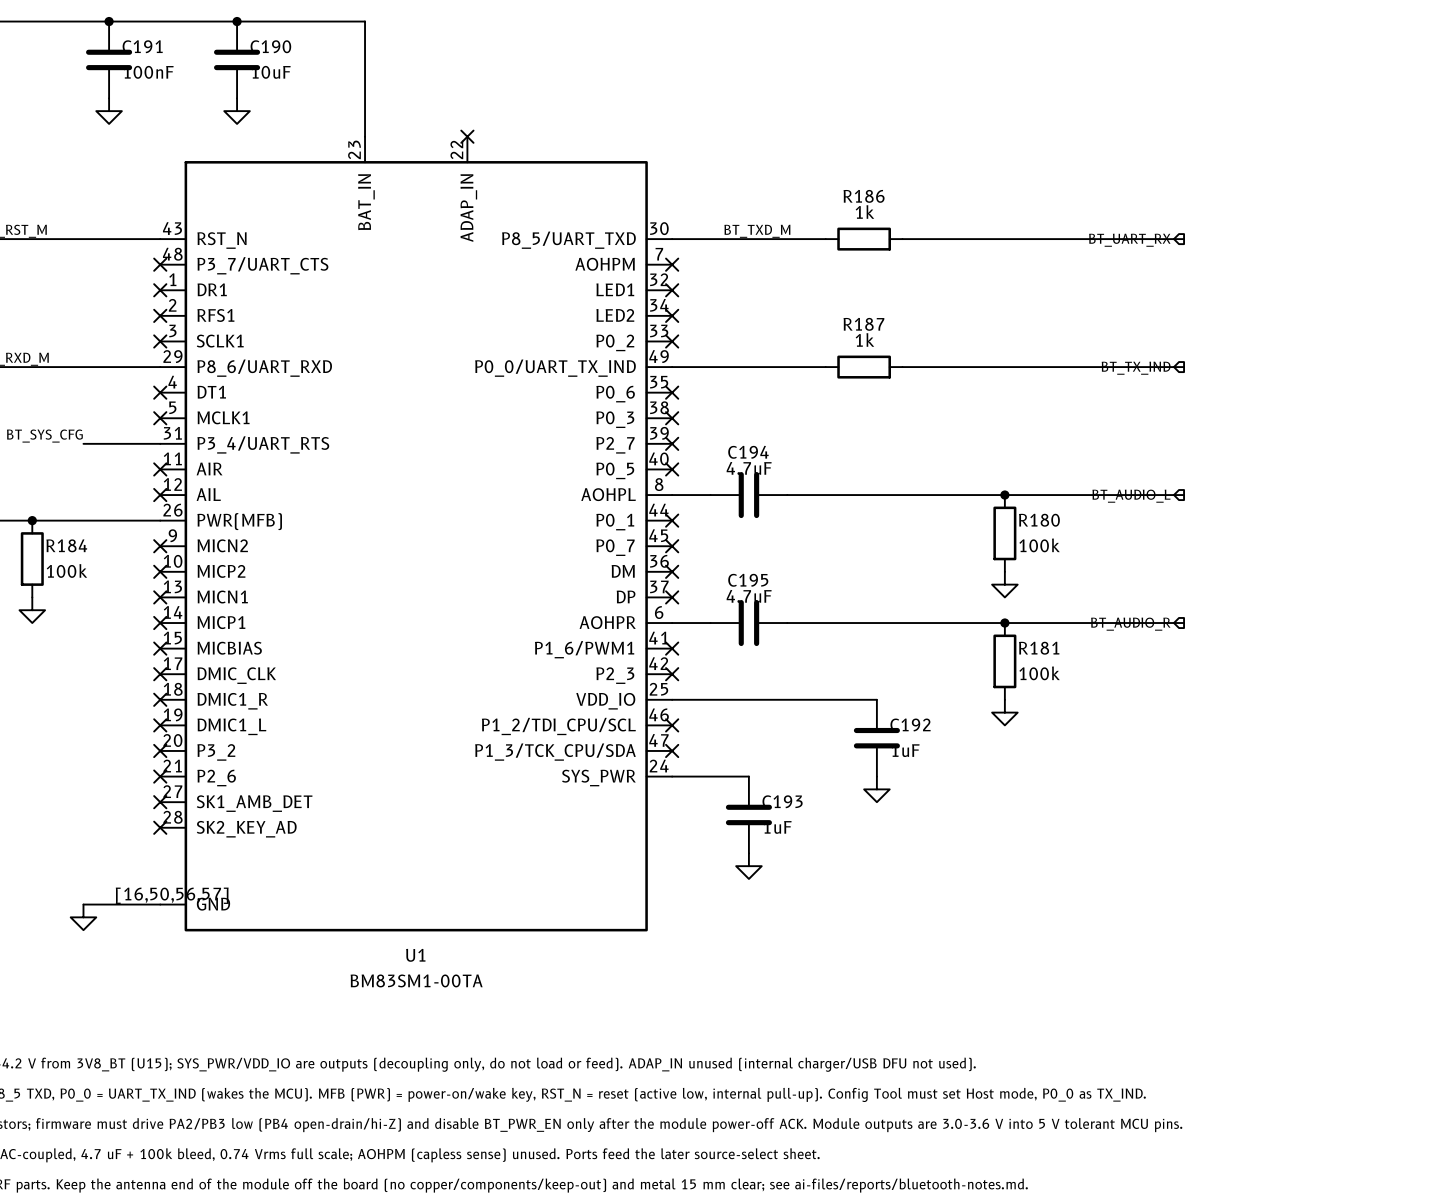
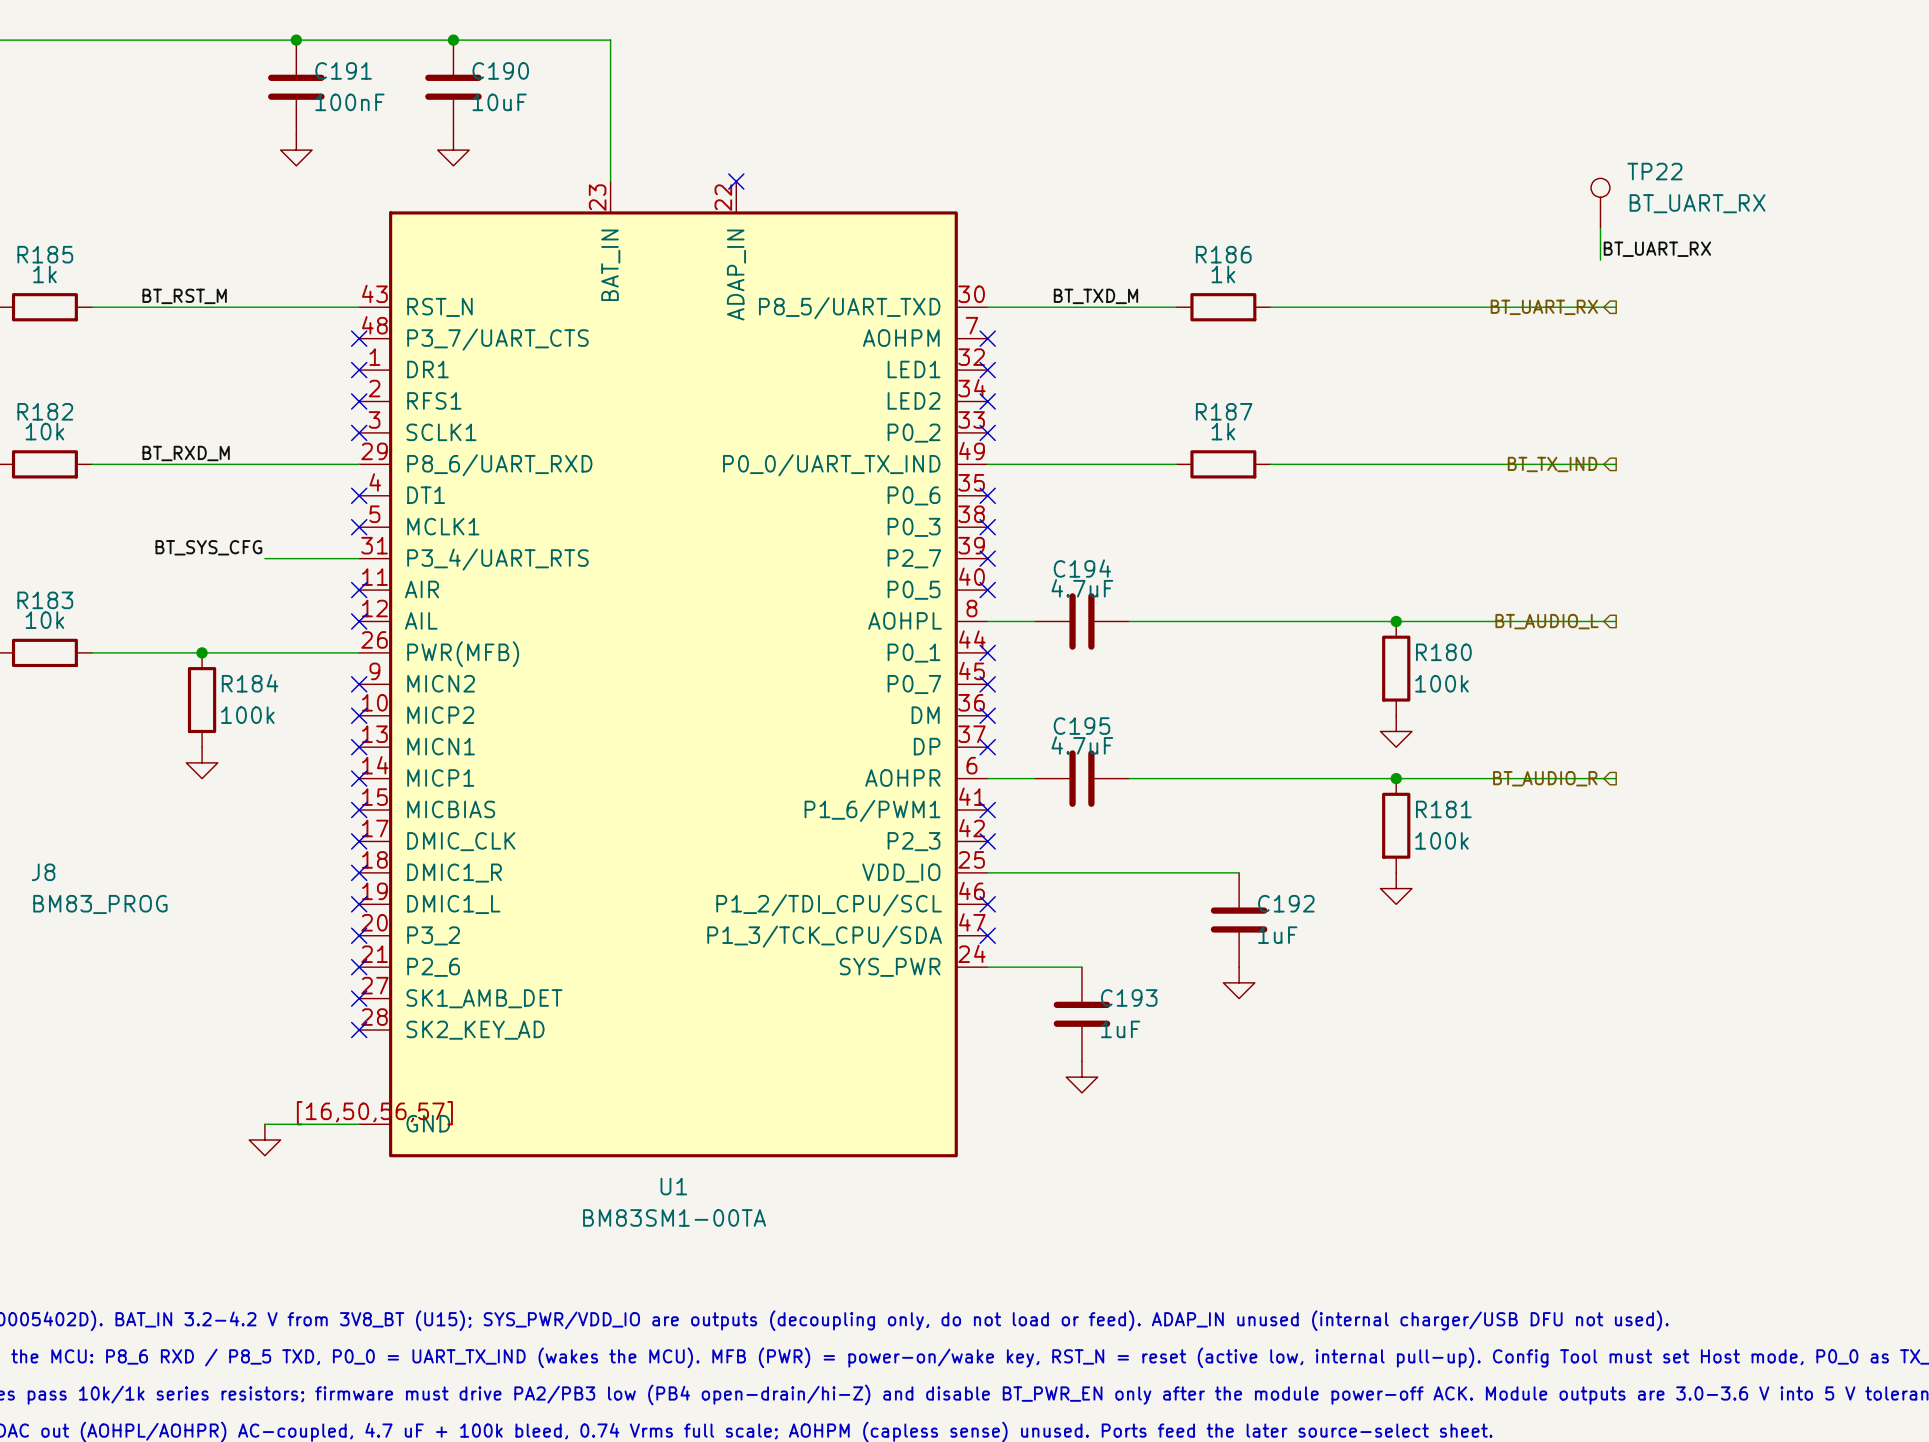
TP22: none -> BT_UART_RX (1600, 203)
wire: none -> (1600, 228) (1600, 260)
label: none -> BT_UART_RX (1657, 249)

